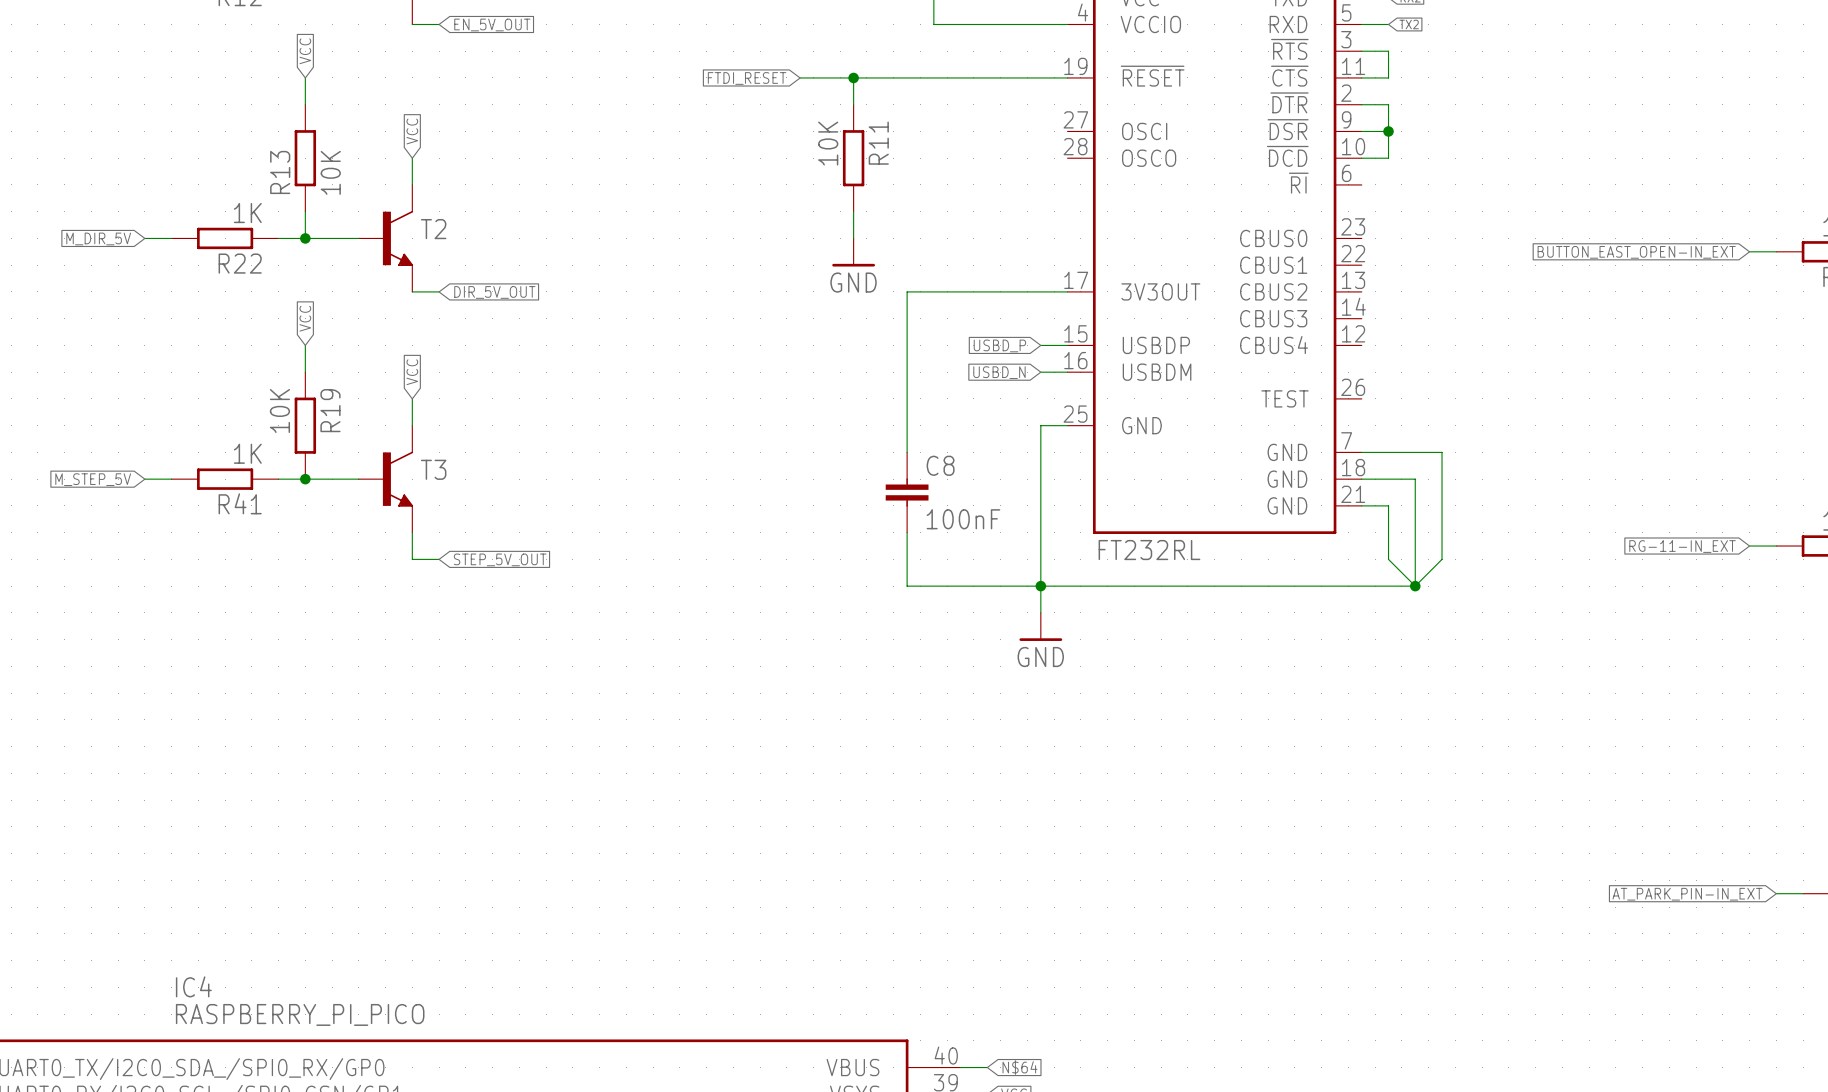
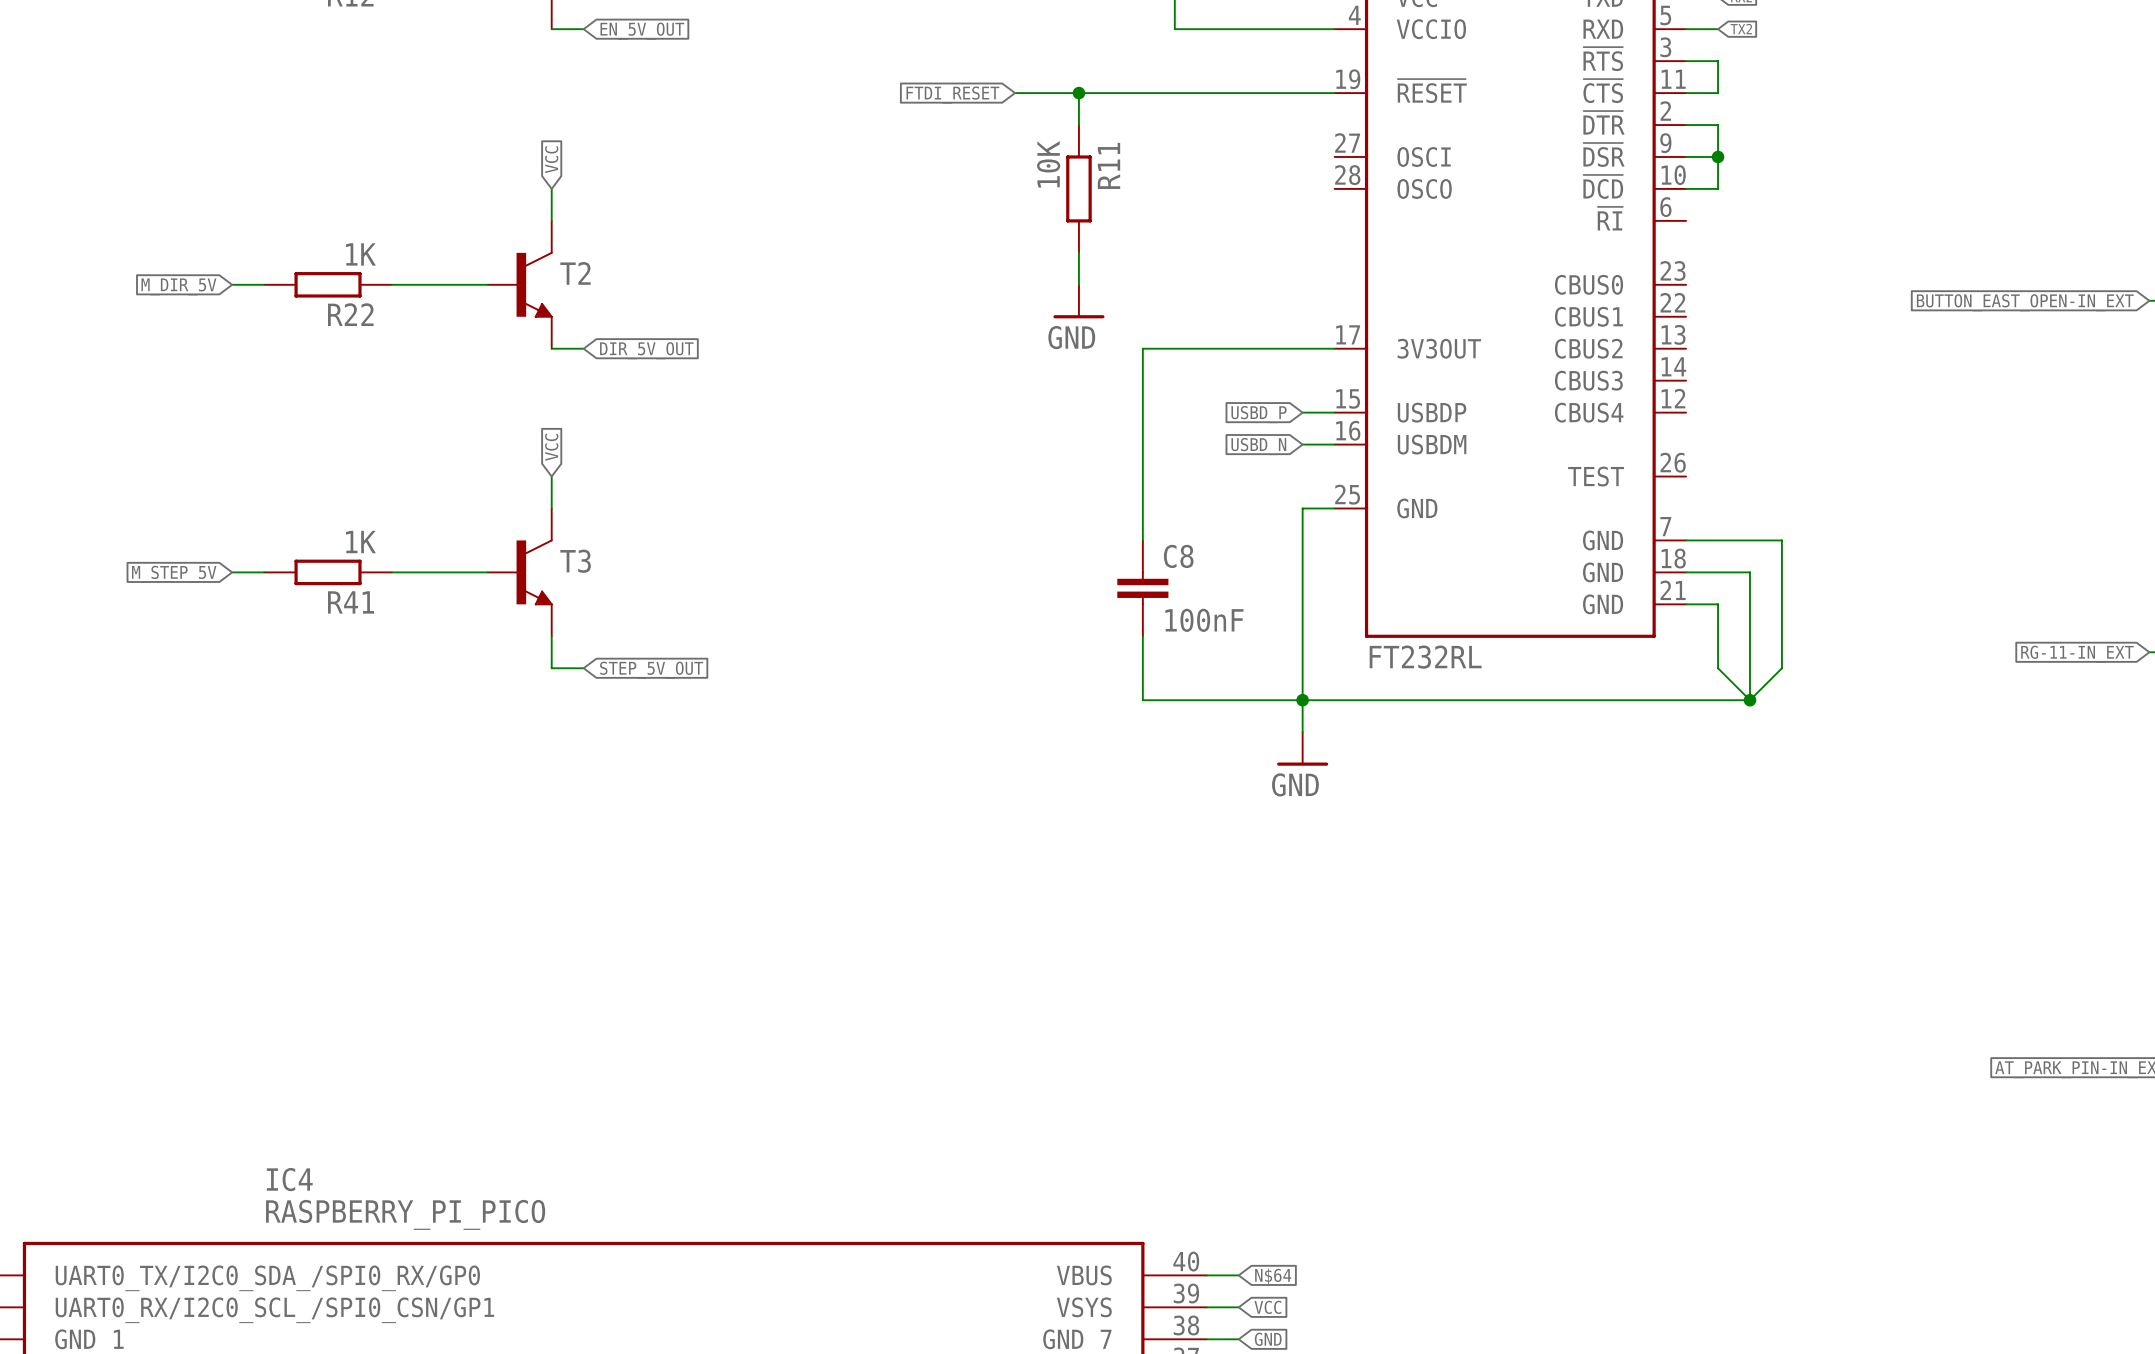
global label: VCC (305, 51) -> none
wire: (305, 77) (305, 104) -> none
R13: 10K (305, 158) -> none
wire: (305, 211) (305, 238) -> none
junction: (305, 238) -> none
global label: VCC (305, 318) -> none
wire: (305, 345) (305, 372) -> none
R19: 10K (305, 425) -> none
junction: (305, 479) -> none

